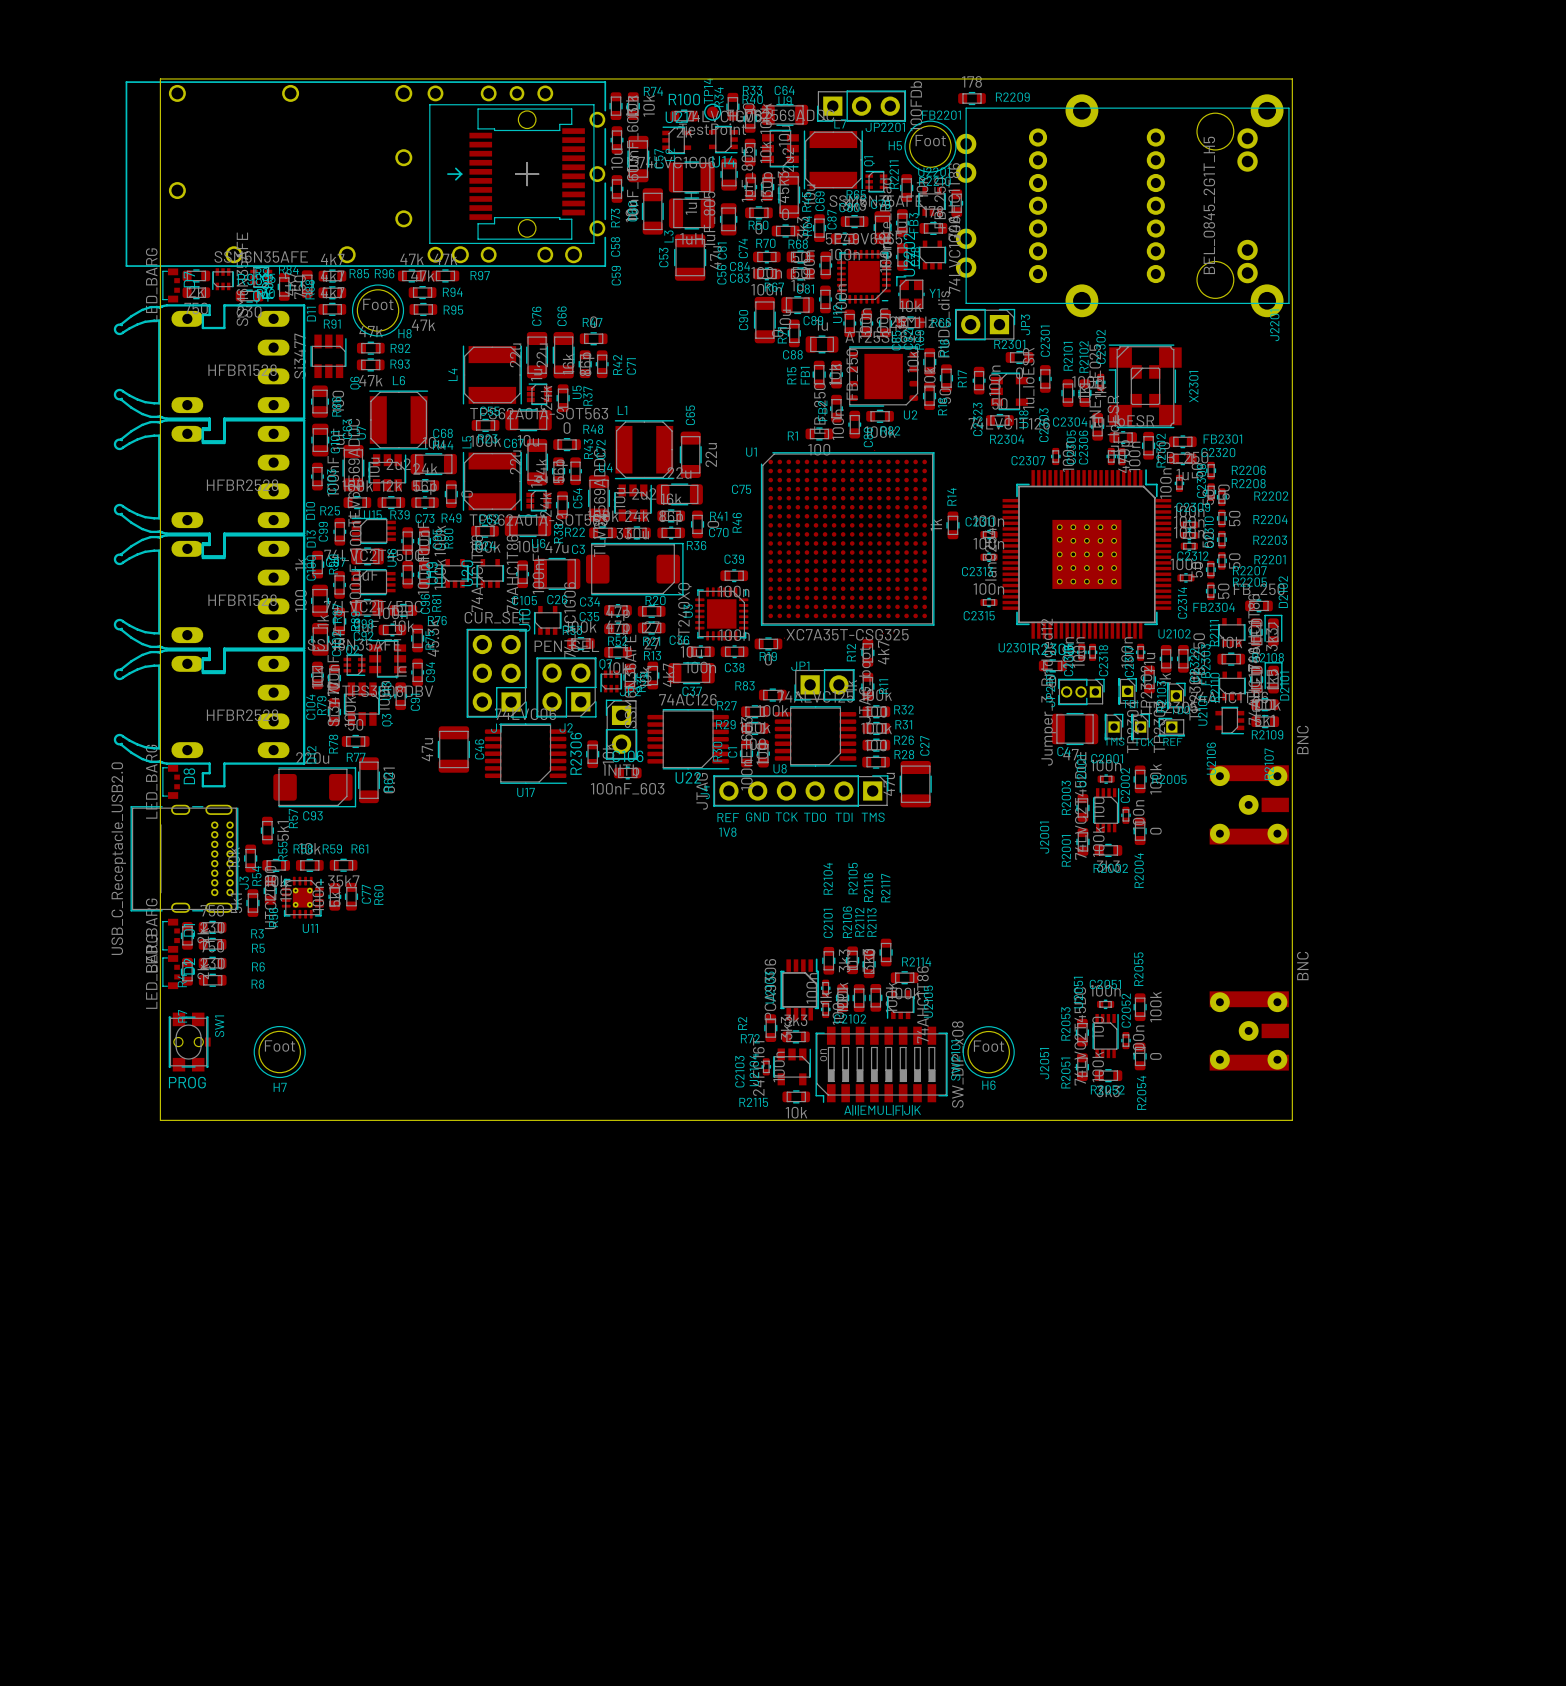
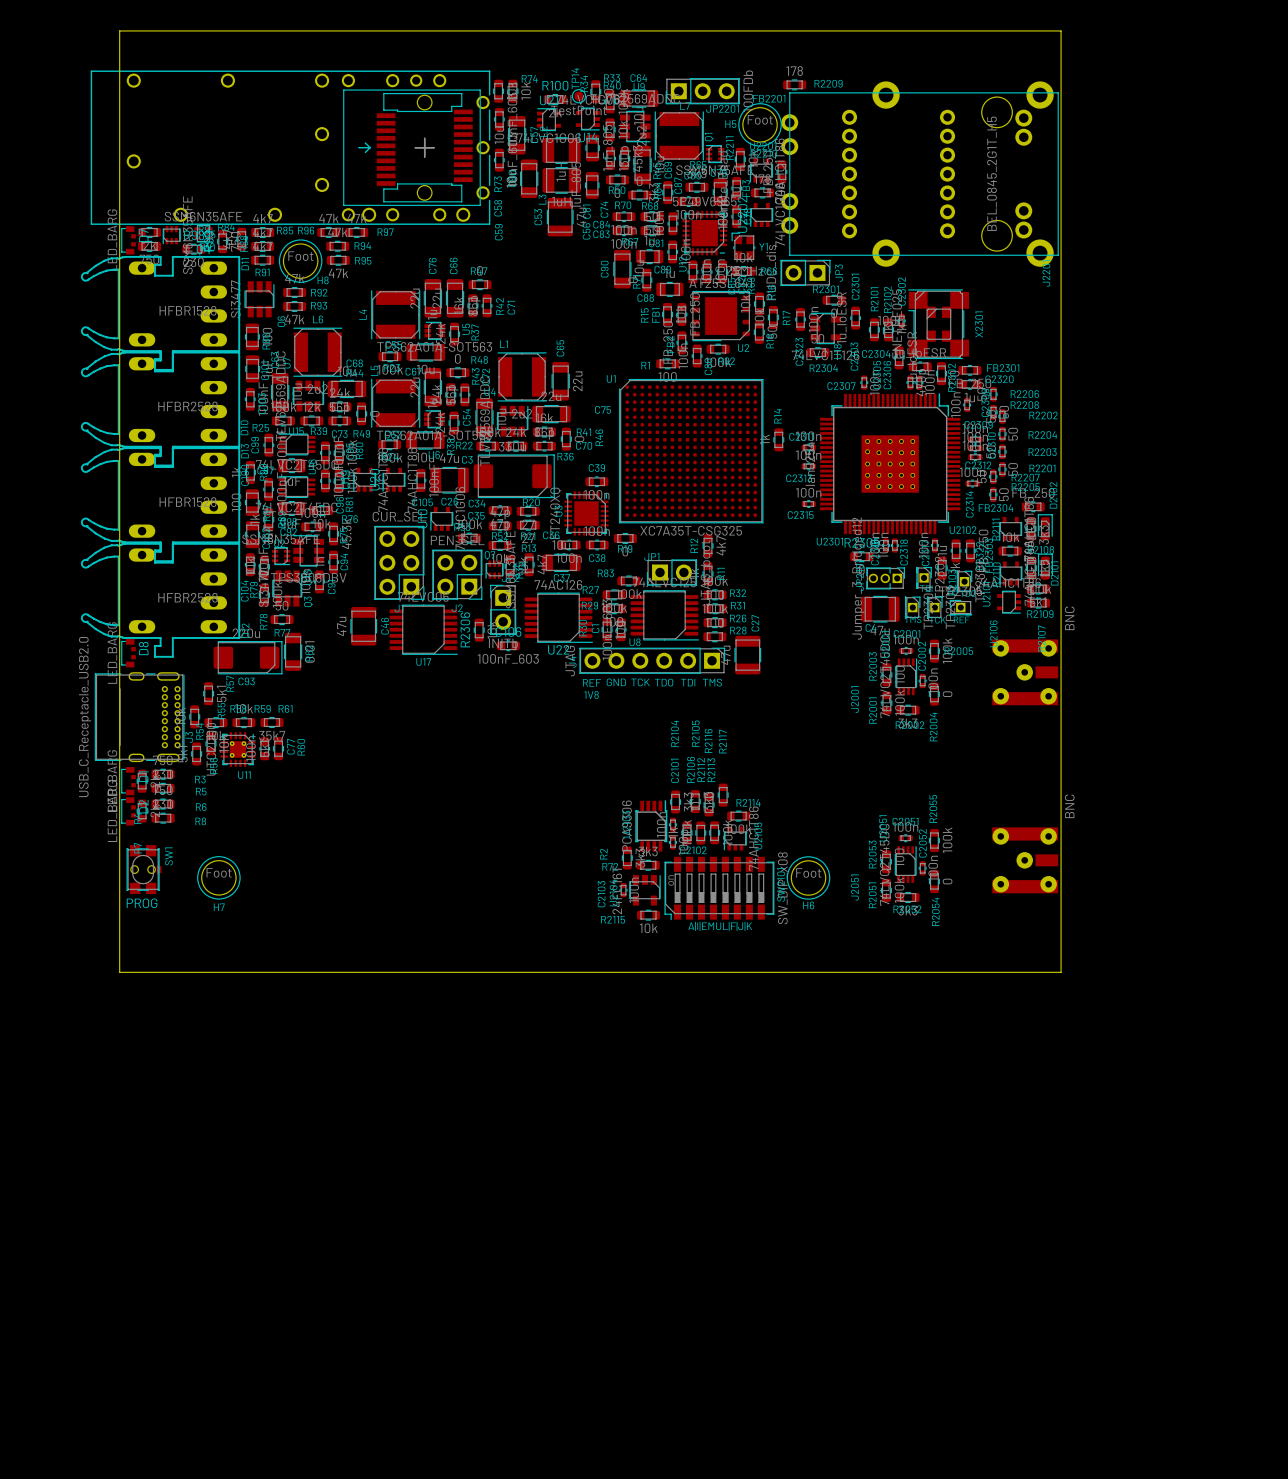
board edge: (160, 78) (1292, 78) -> (119, 68) (119, 30) (1061, 30) (1061, 68)
board edge: (160, 1120) (1292, 1120) -> (119, 934) (119, 972) (1061, 972) (1061, 934)

